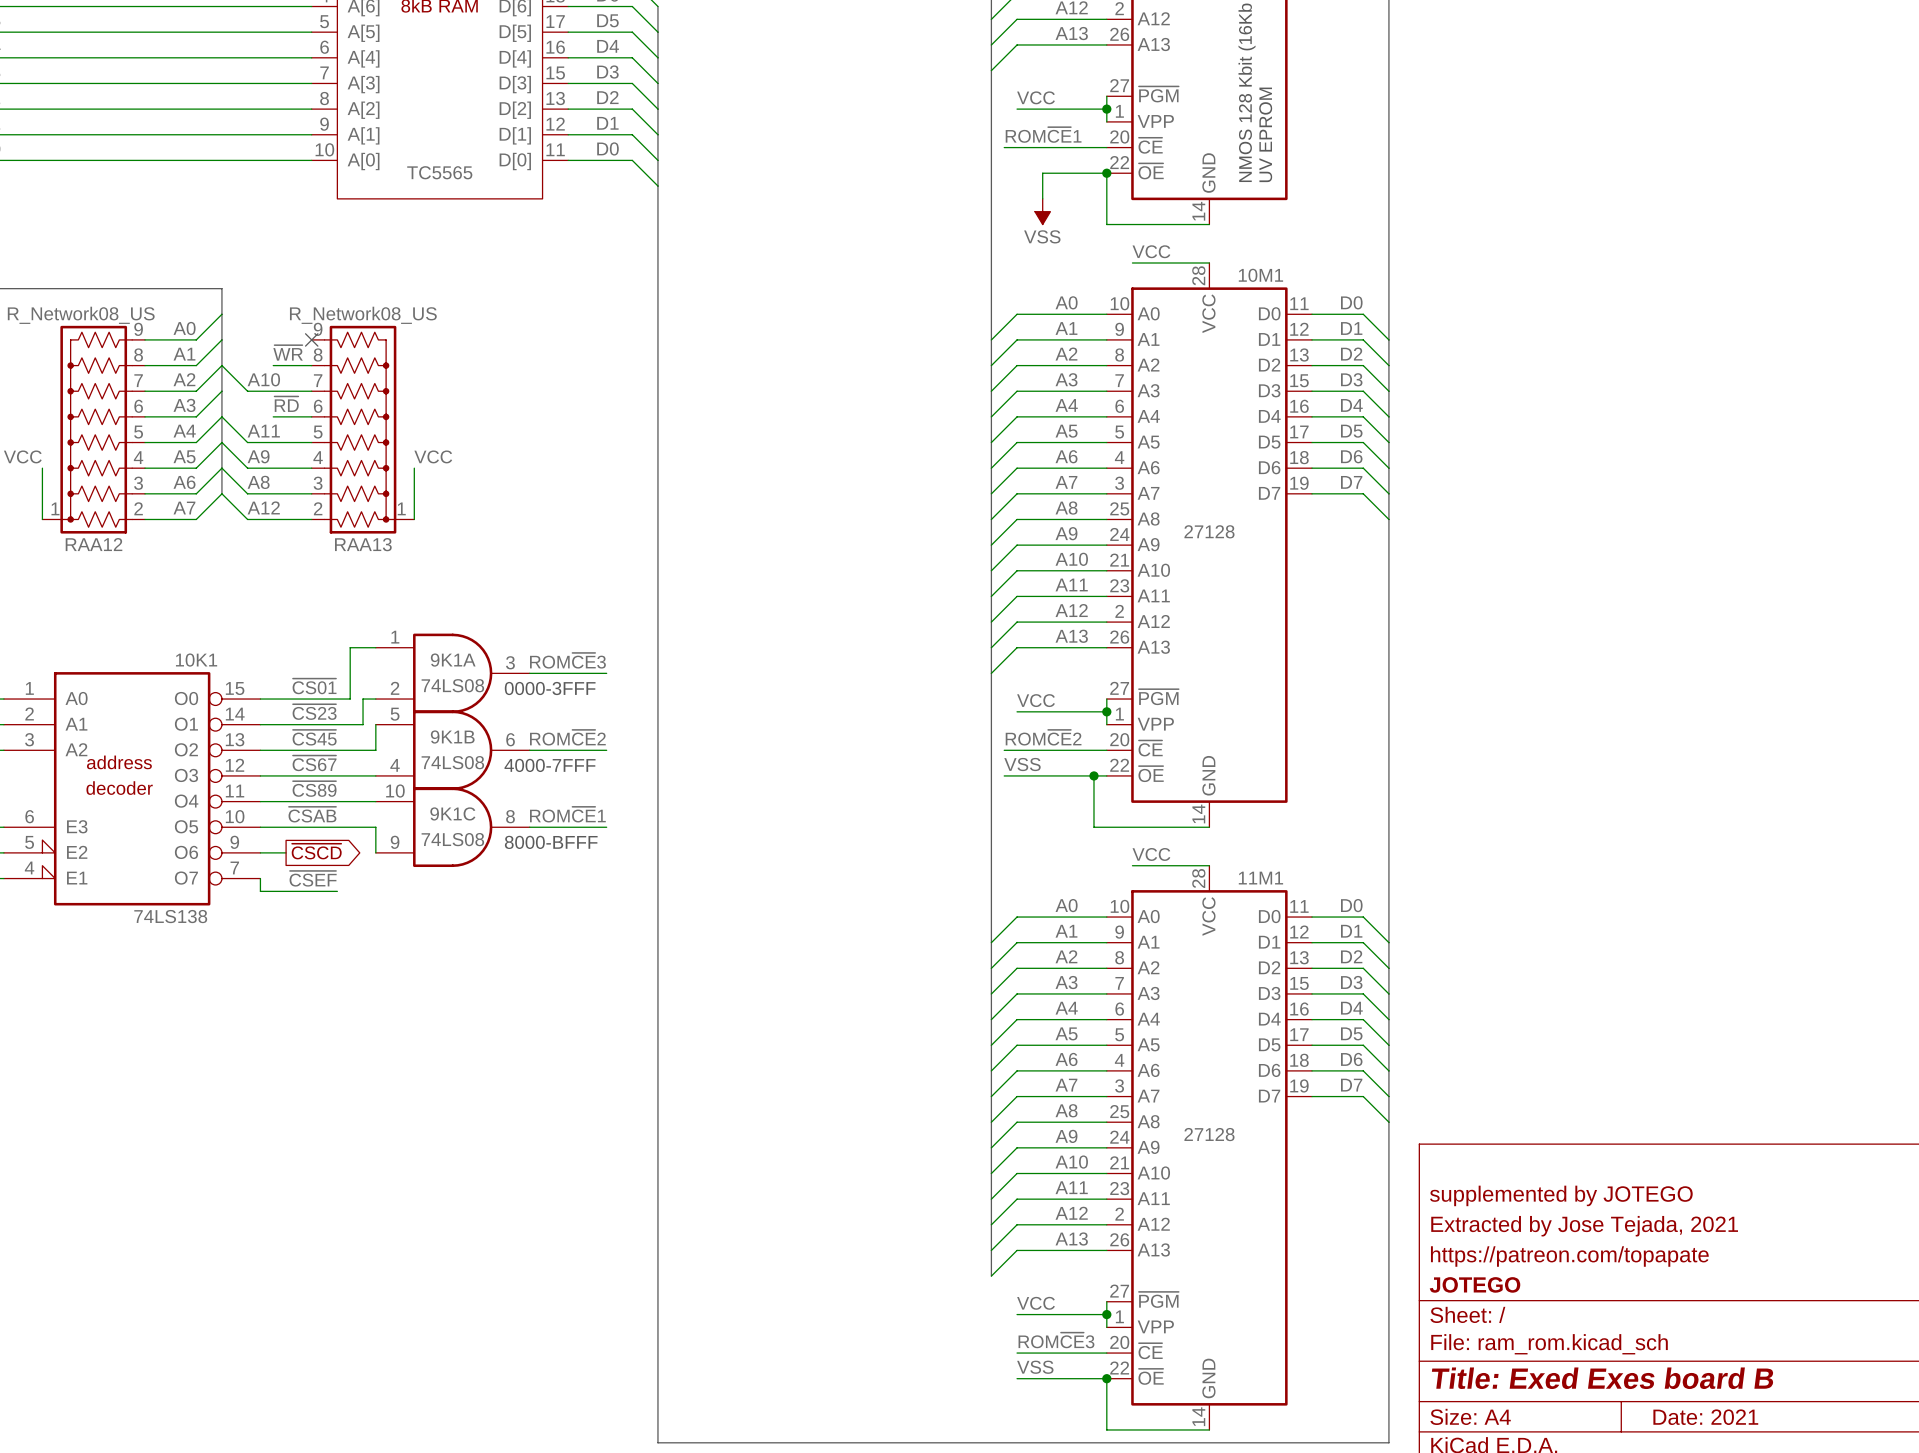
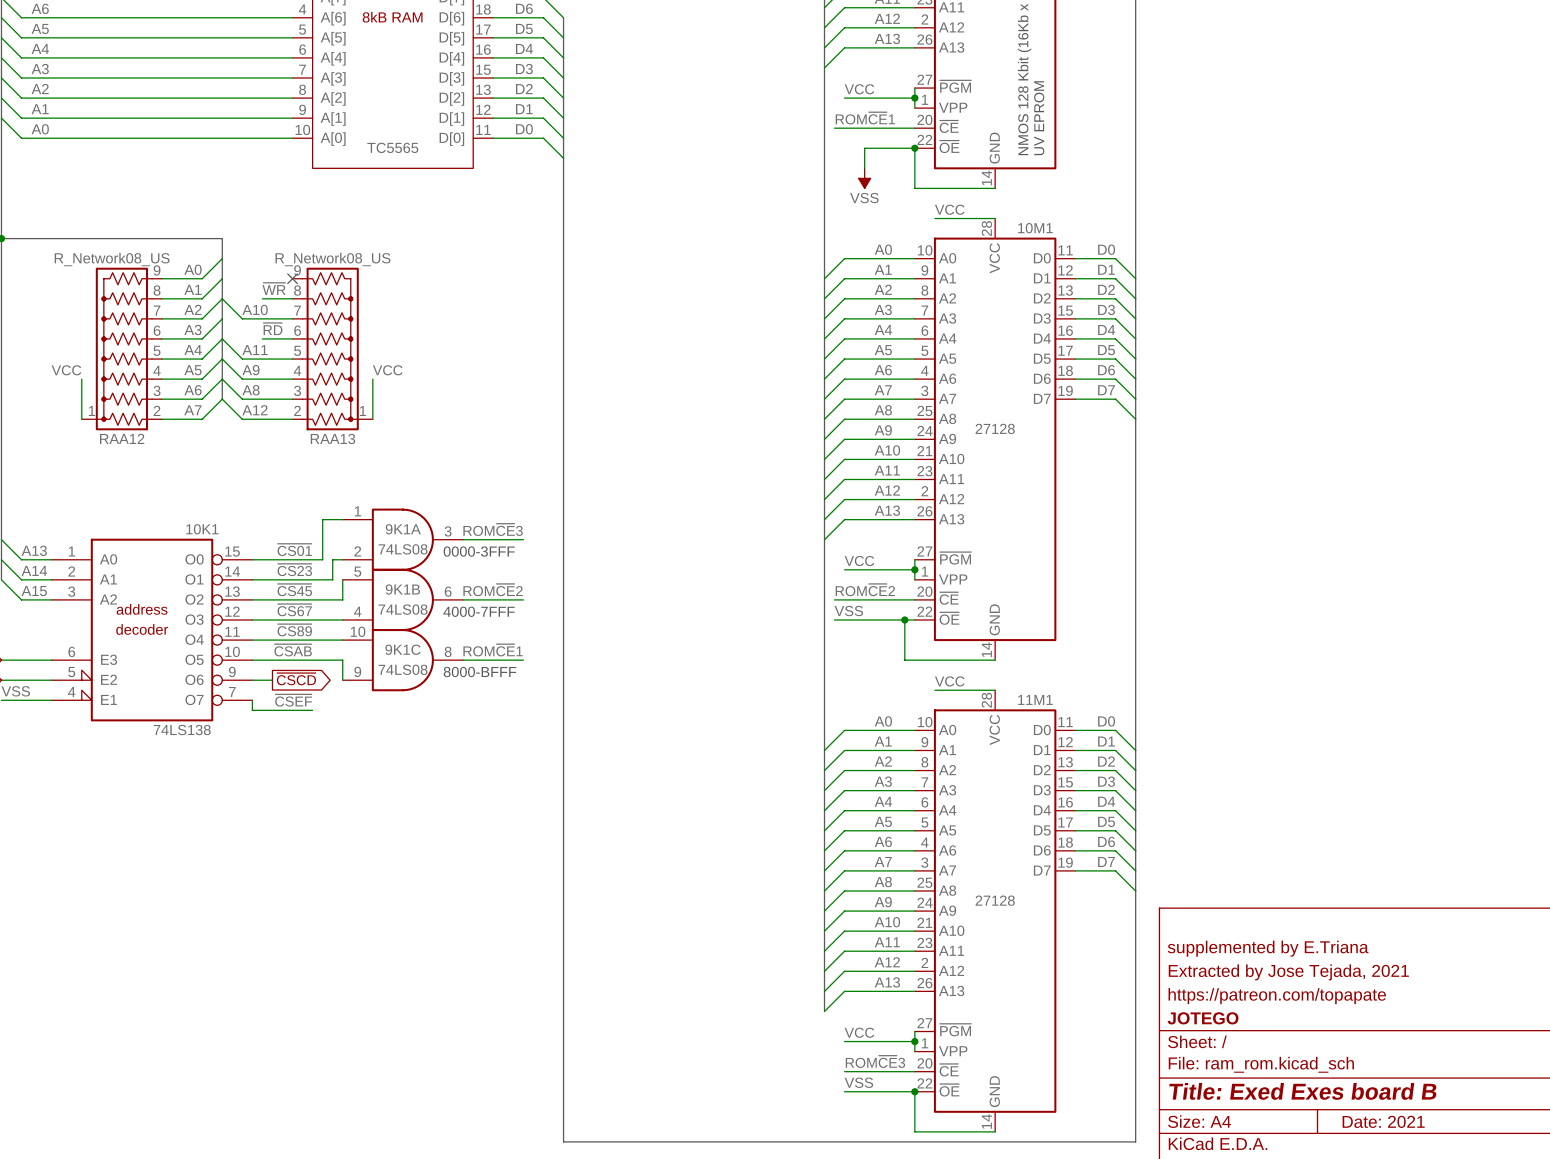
title block: supplemented by JOTEGO (1561, 1195) -> supplemented by E.Triana (1268, 948)

